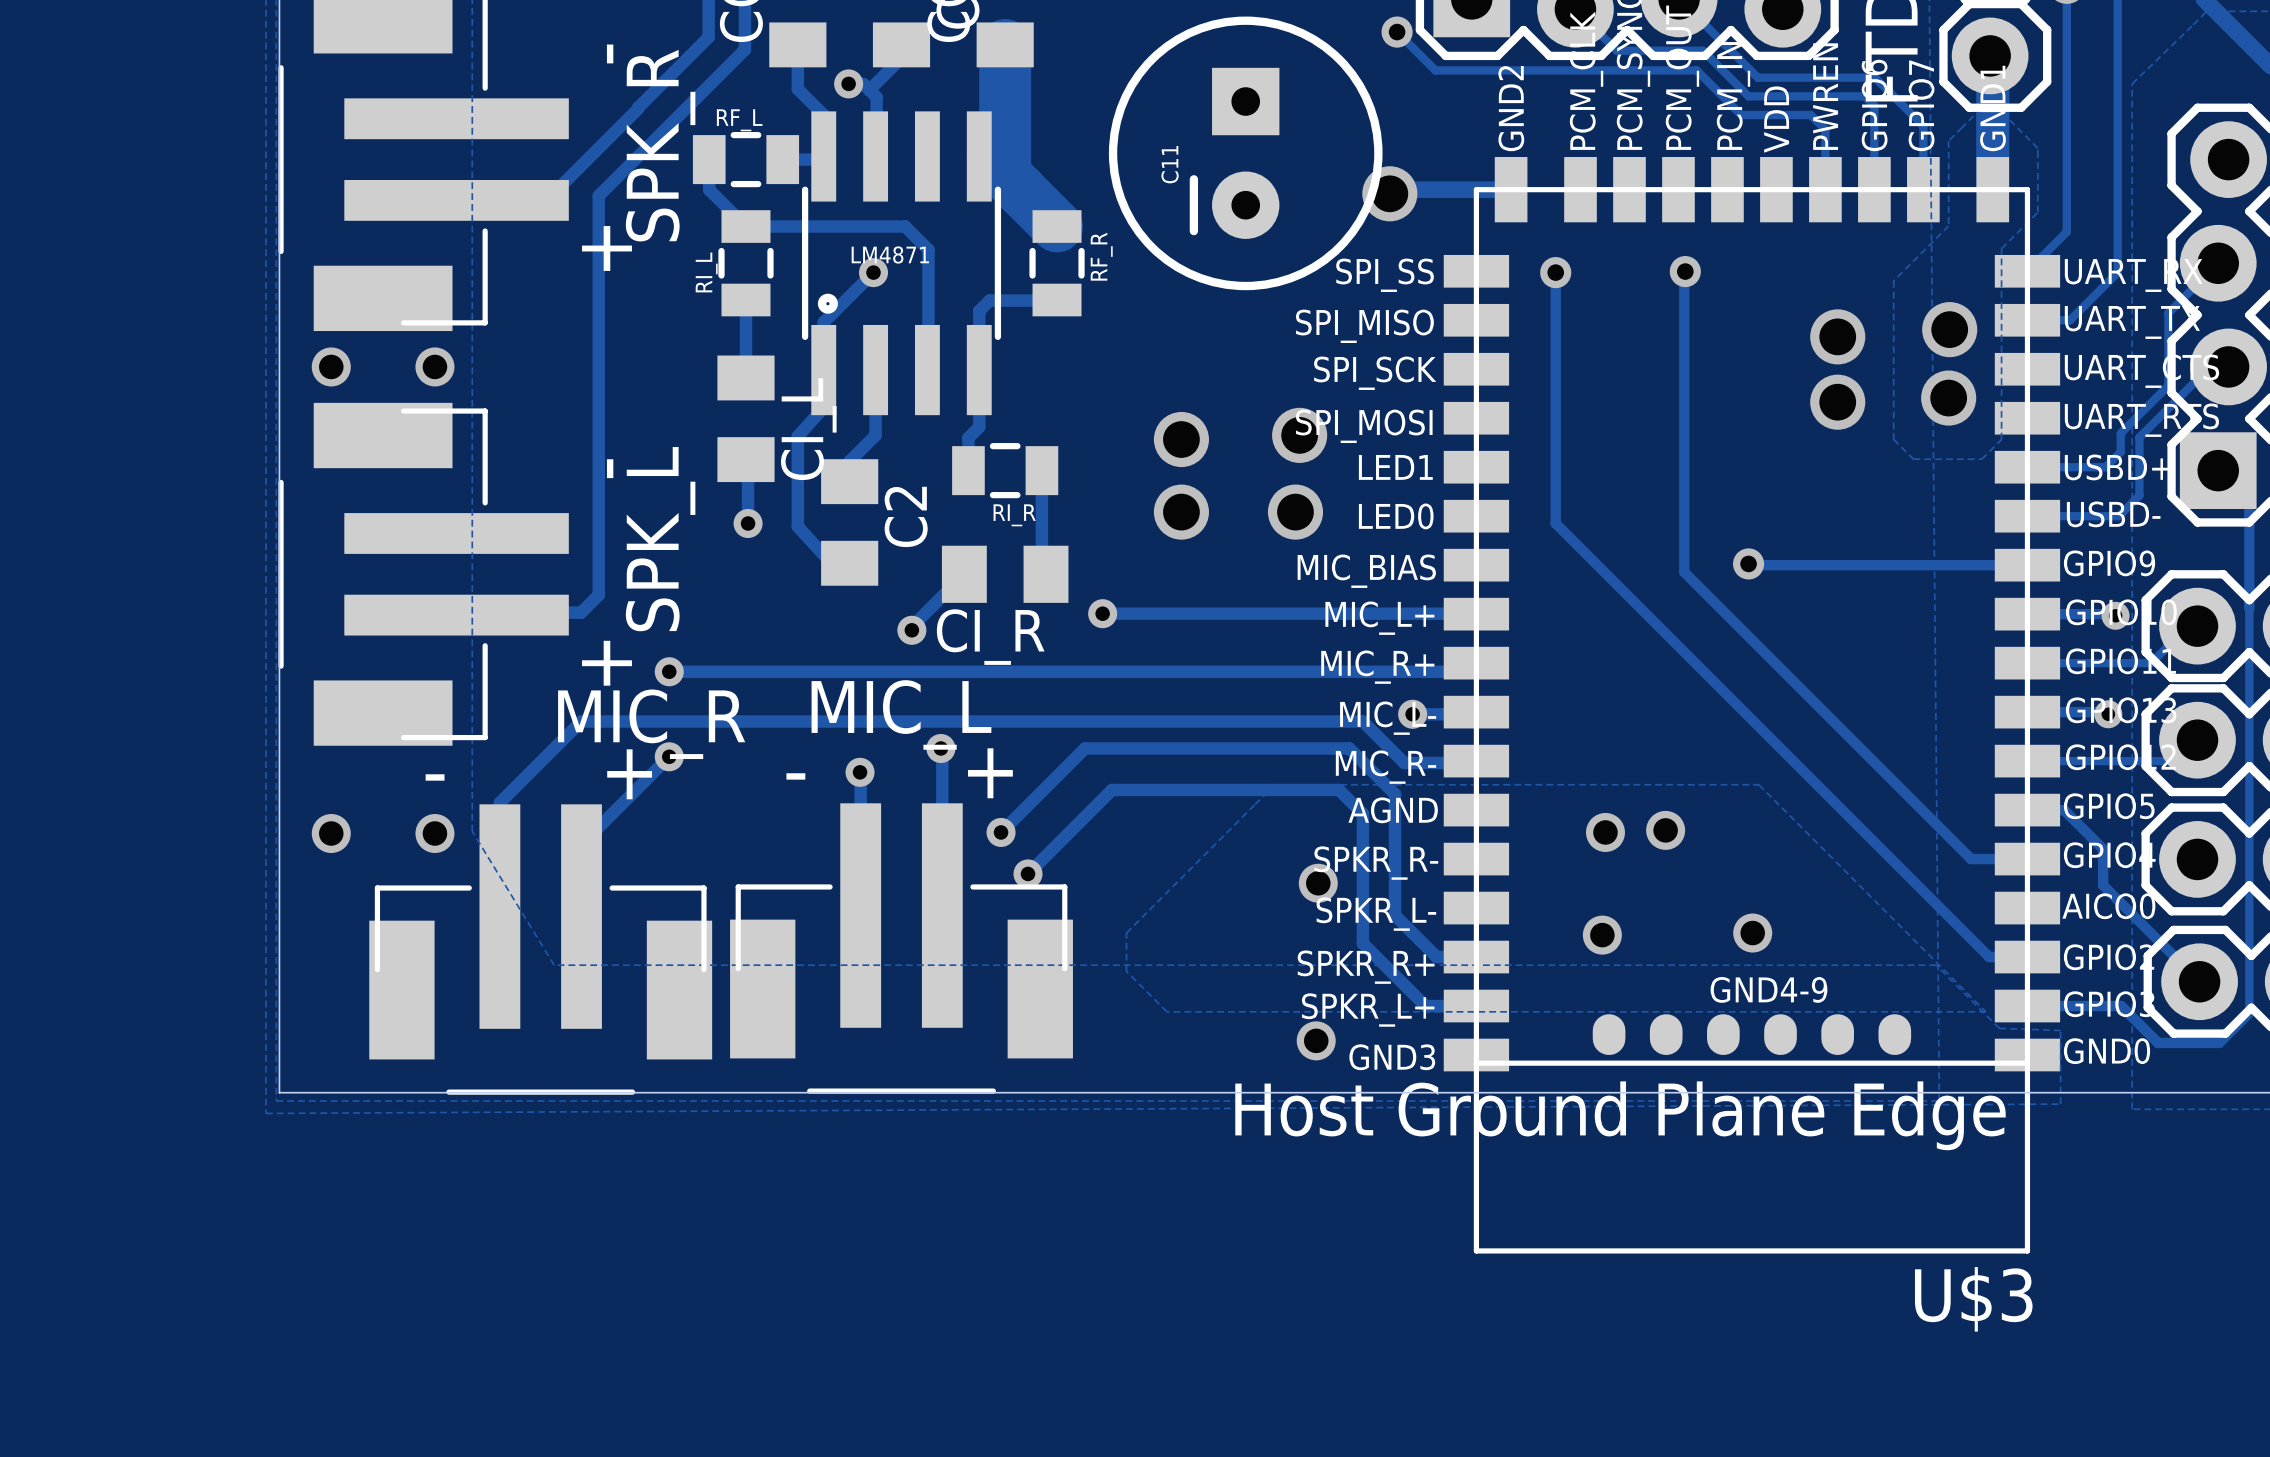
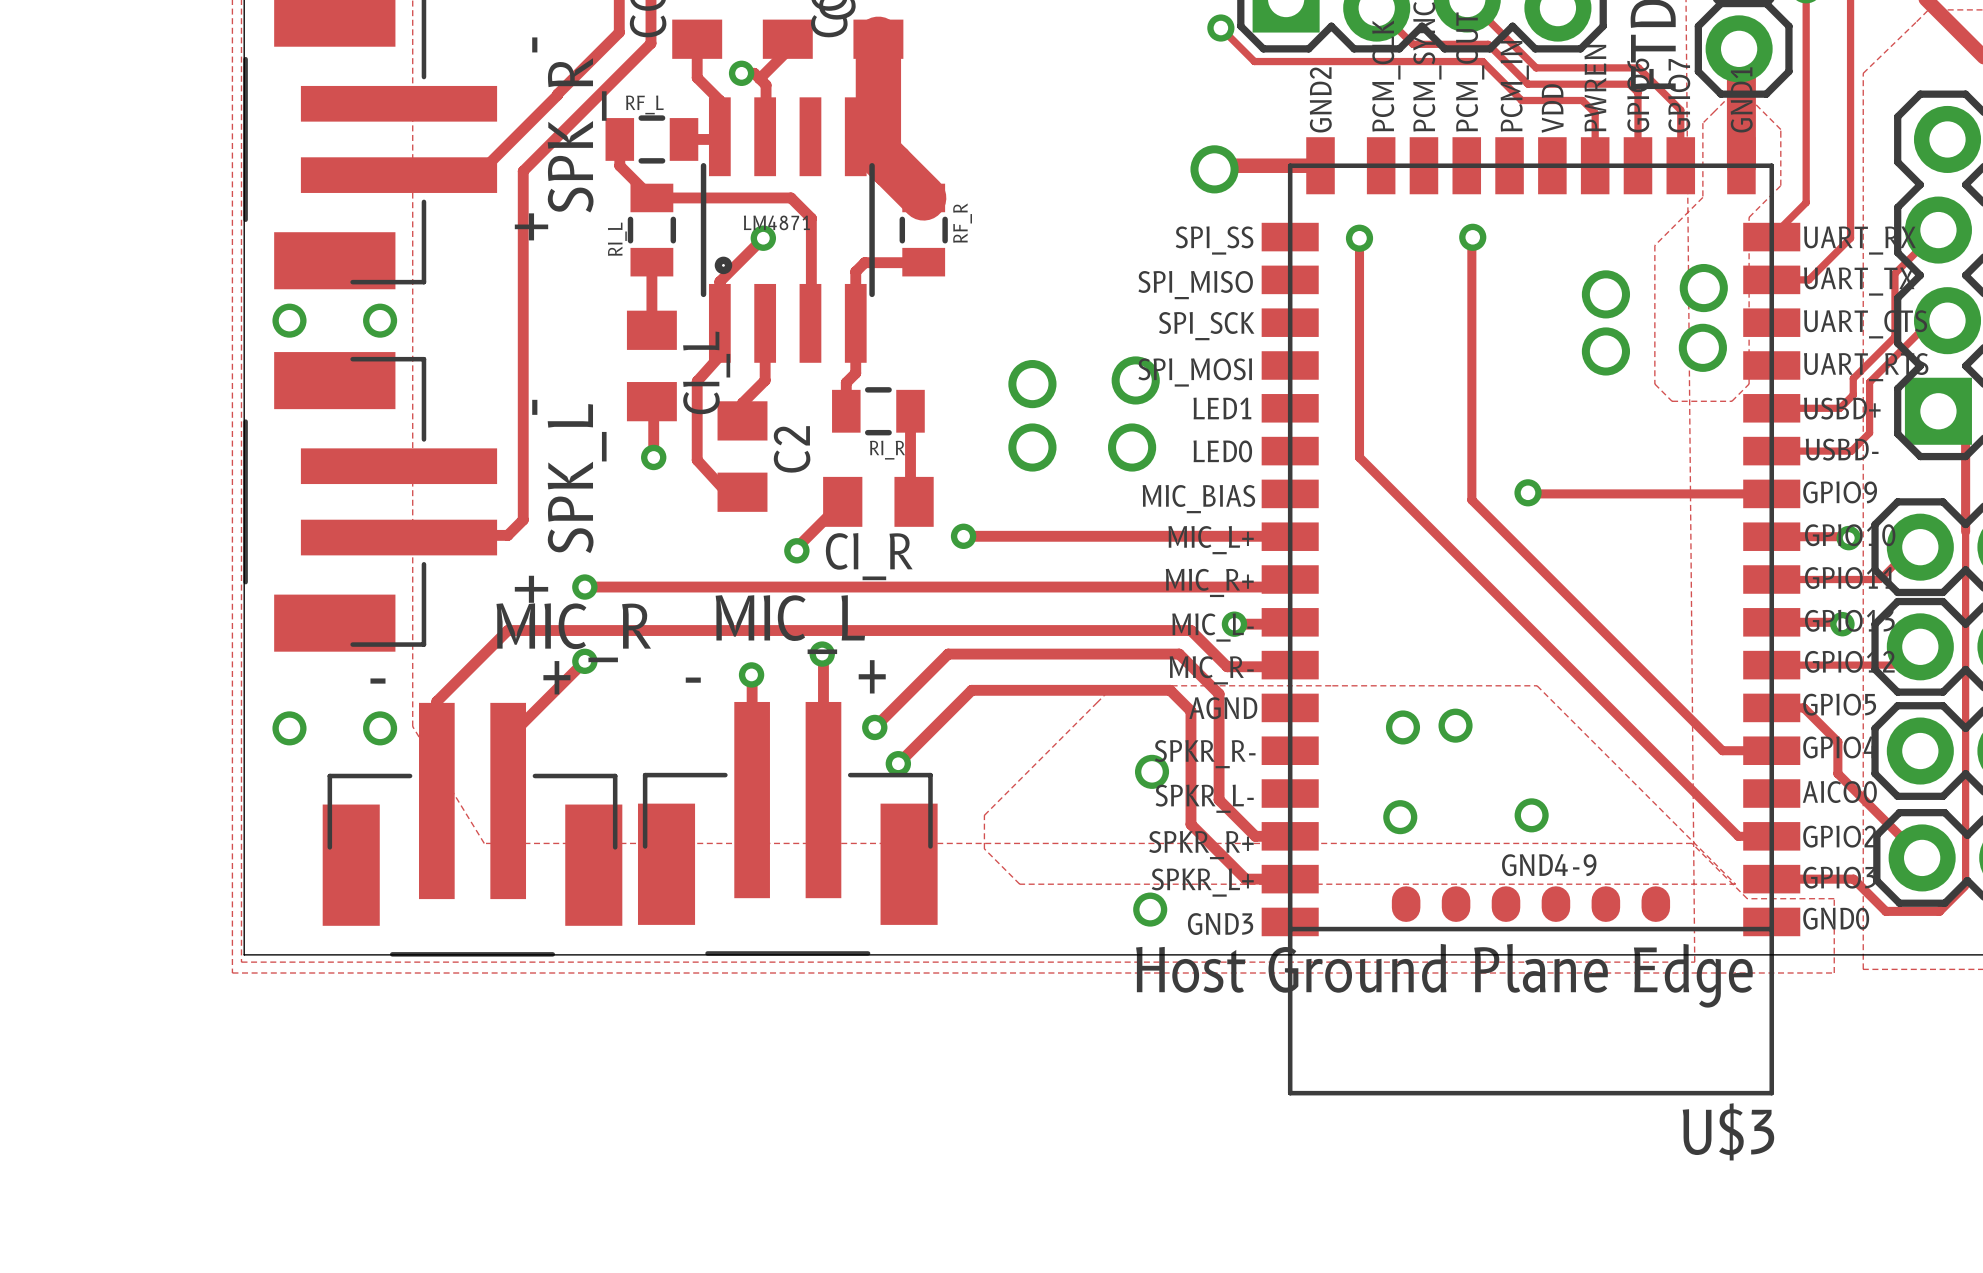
C11: (1245, 153) -> none
zone outline: (1999, 1028) (2060, 1030) (2060, 1104) (265, 1113) -> (1747, 898) (1834, 898) (1834, 973) (232, 973)

